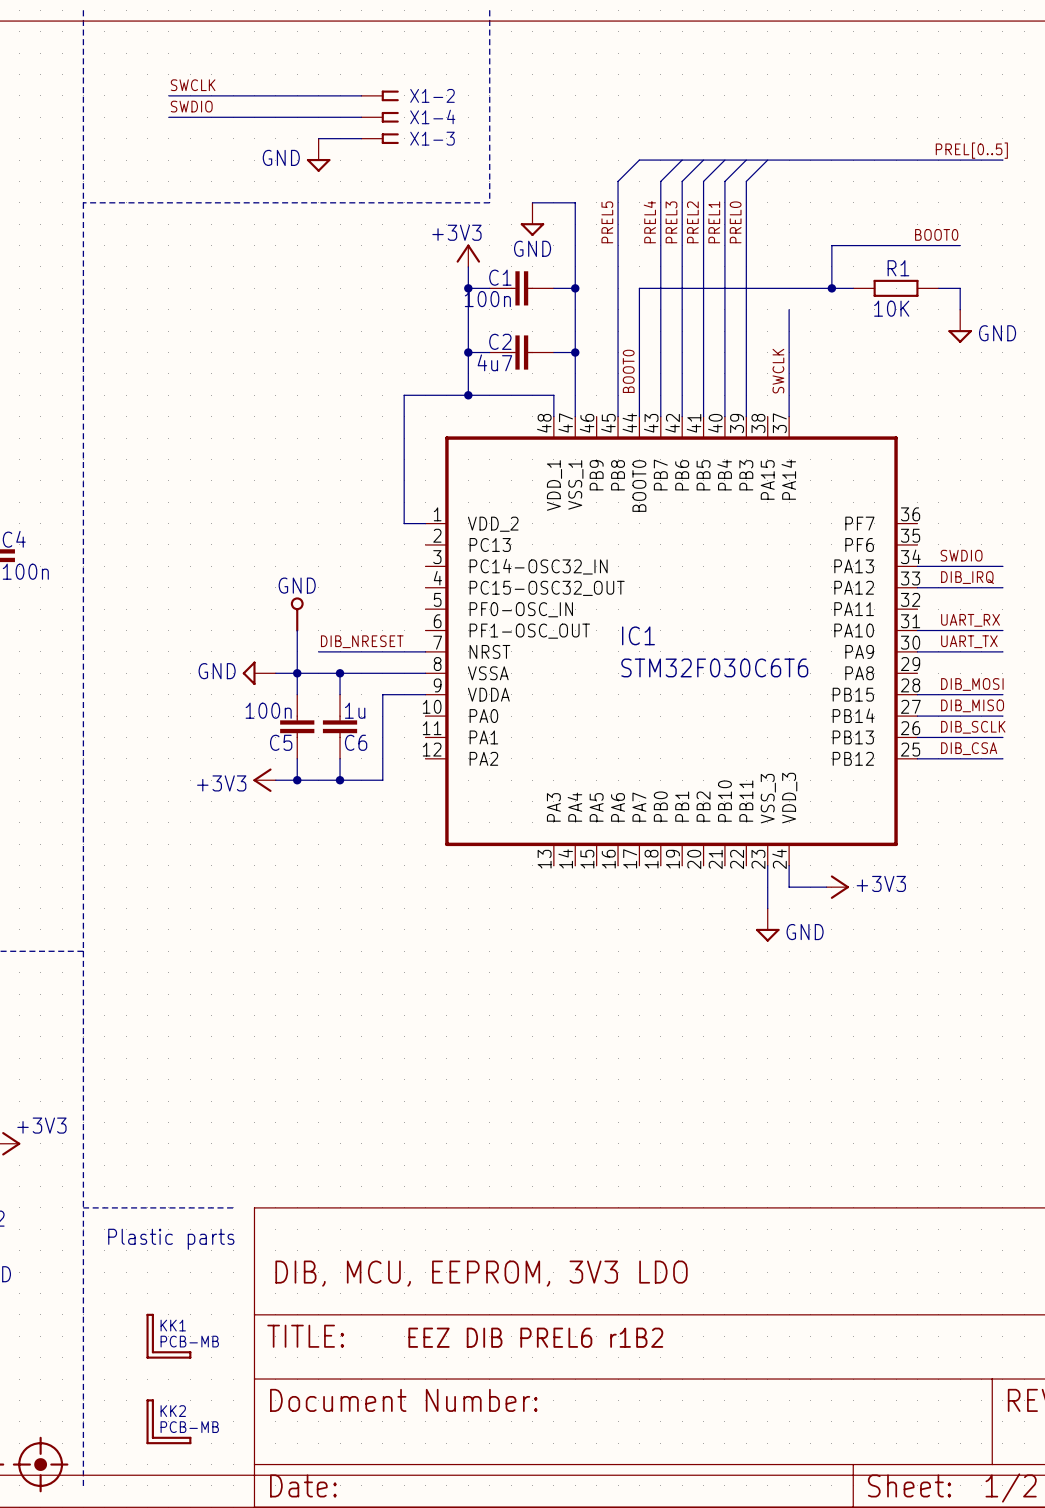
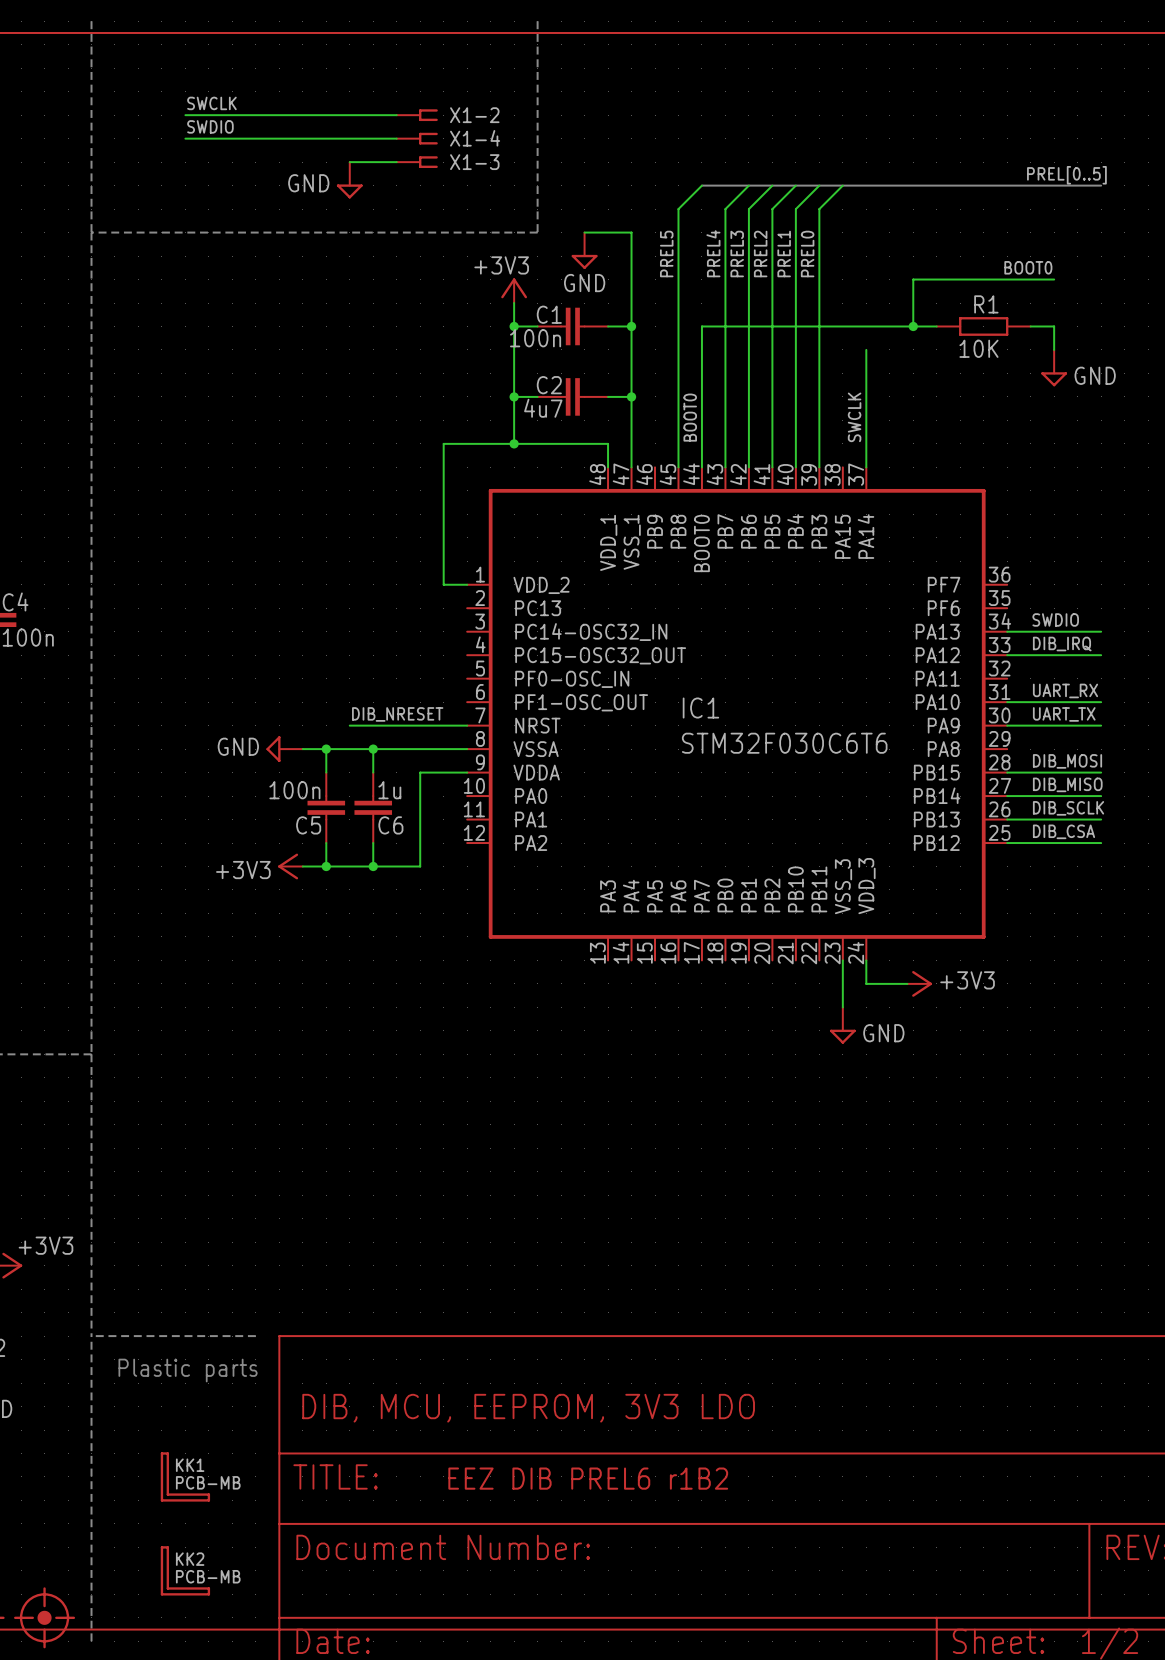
GND: (297, 614) -> none
wire: (297, 630) (297, 673) -> none

